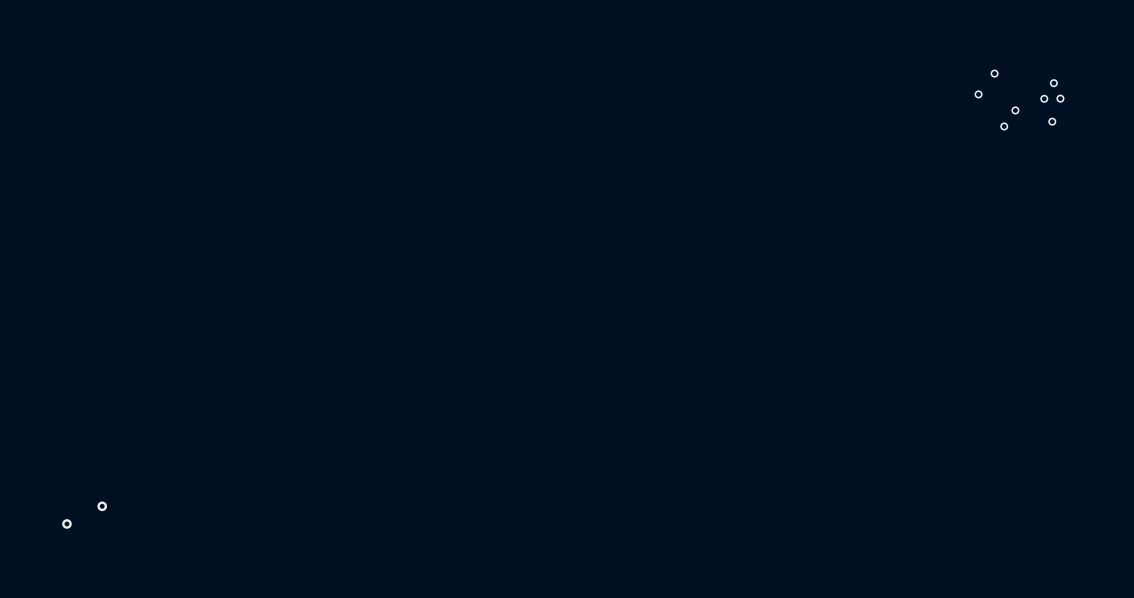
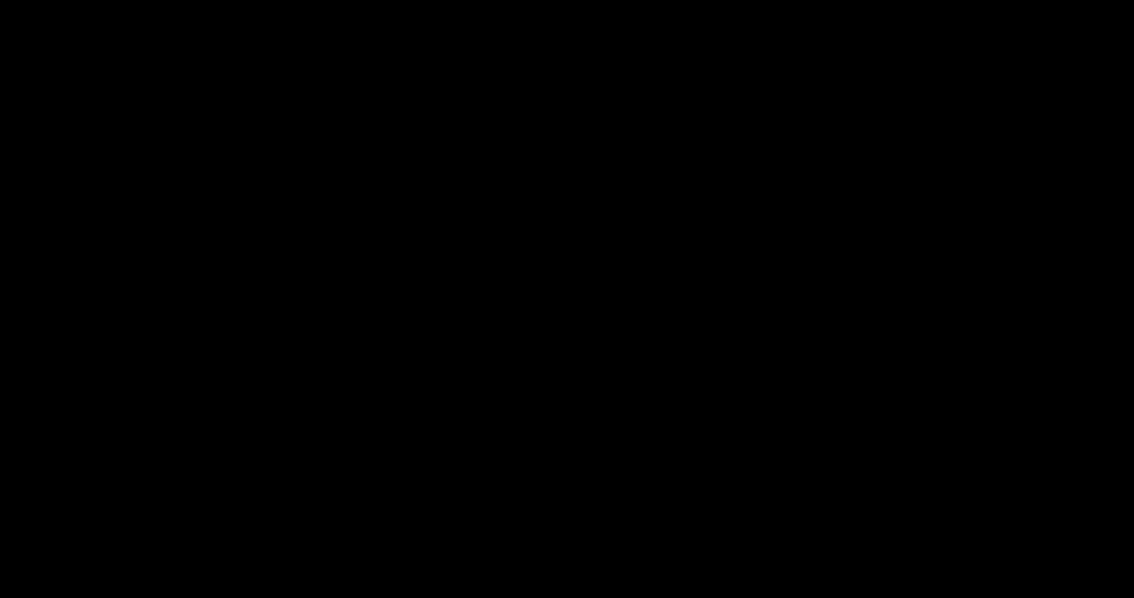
via: (994, 73) -> none
via: (1053, 83) -> none
via: (978, 94) -> none
via: (1044, 98) -> none
via: (1060, 98) -> none
via: (1015, 110) -> none
via: (1052, 121) -> none
via: (1004, 126) -> none
via: (102, 506) -> none
via: (66, 523) -> none

